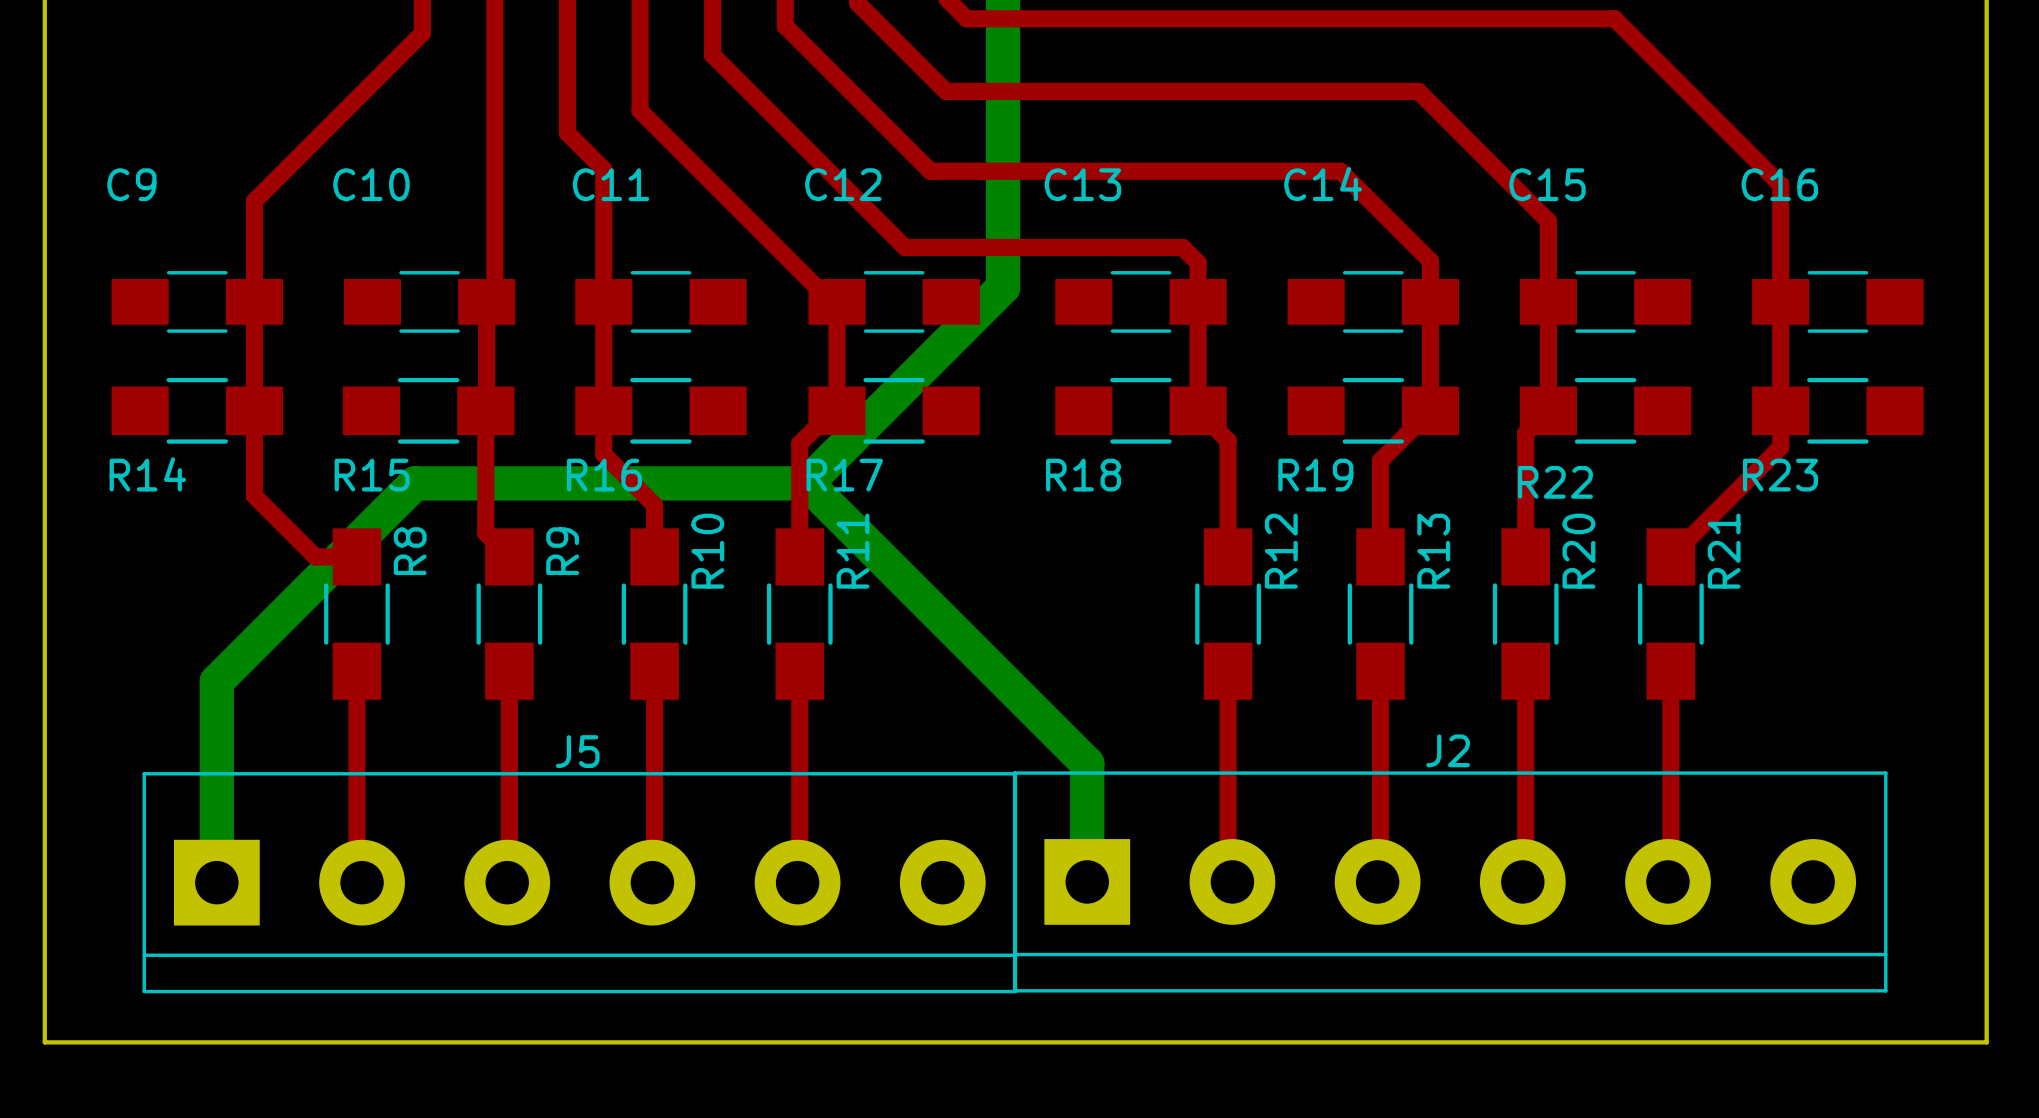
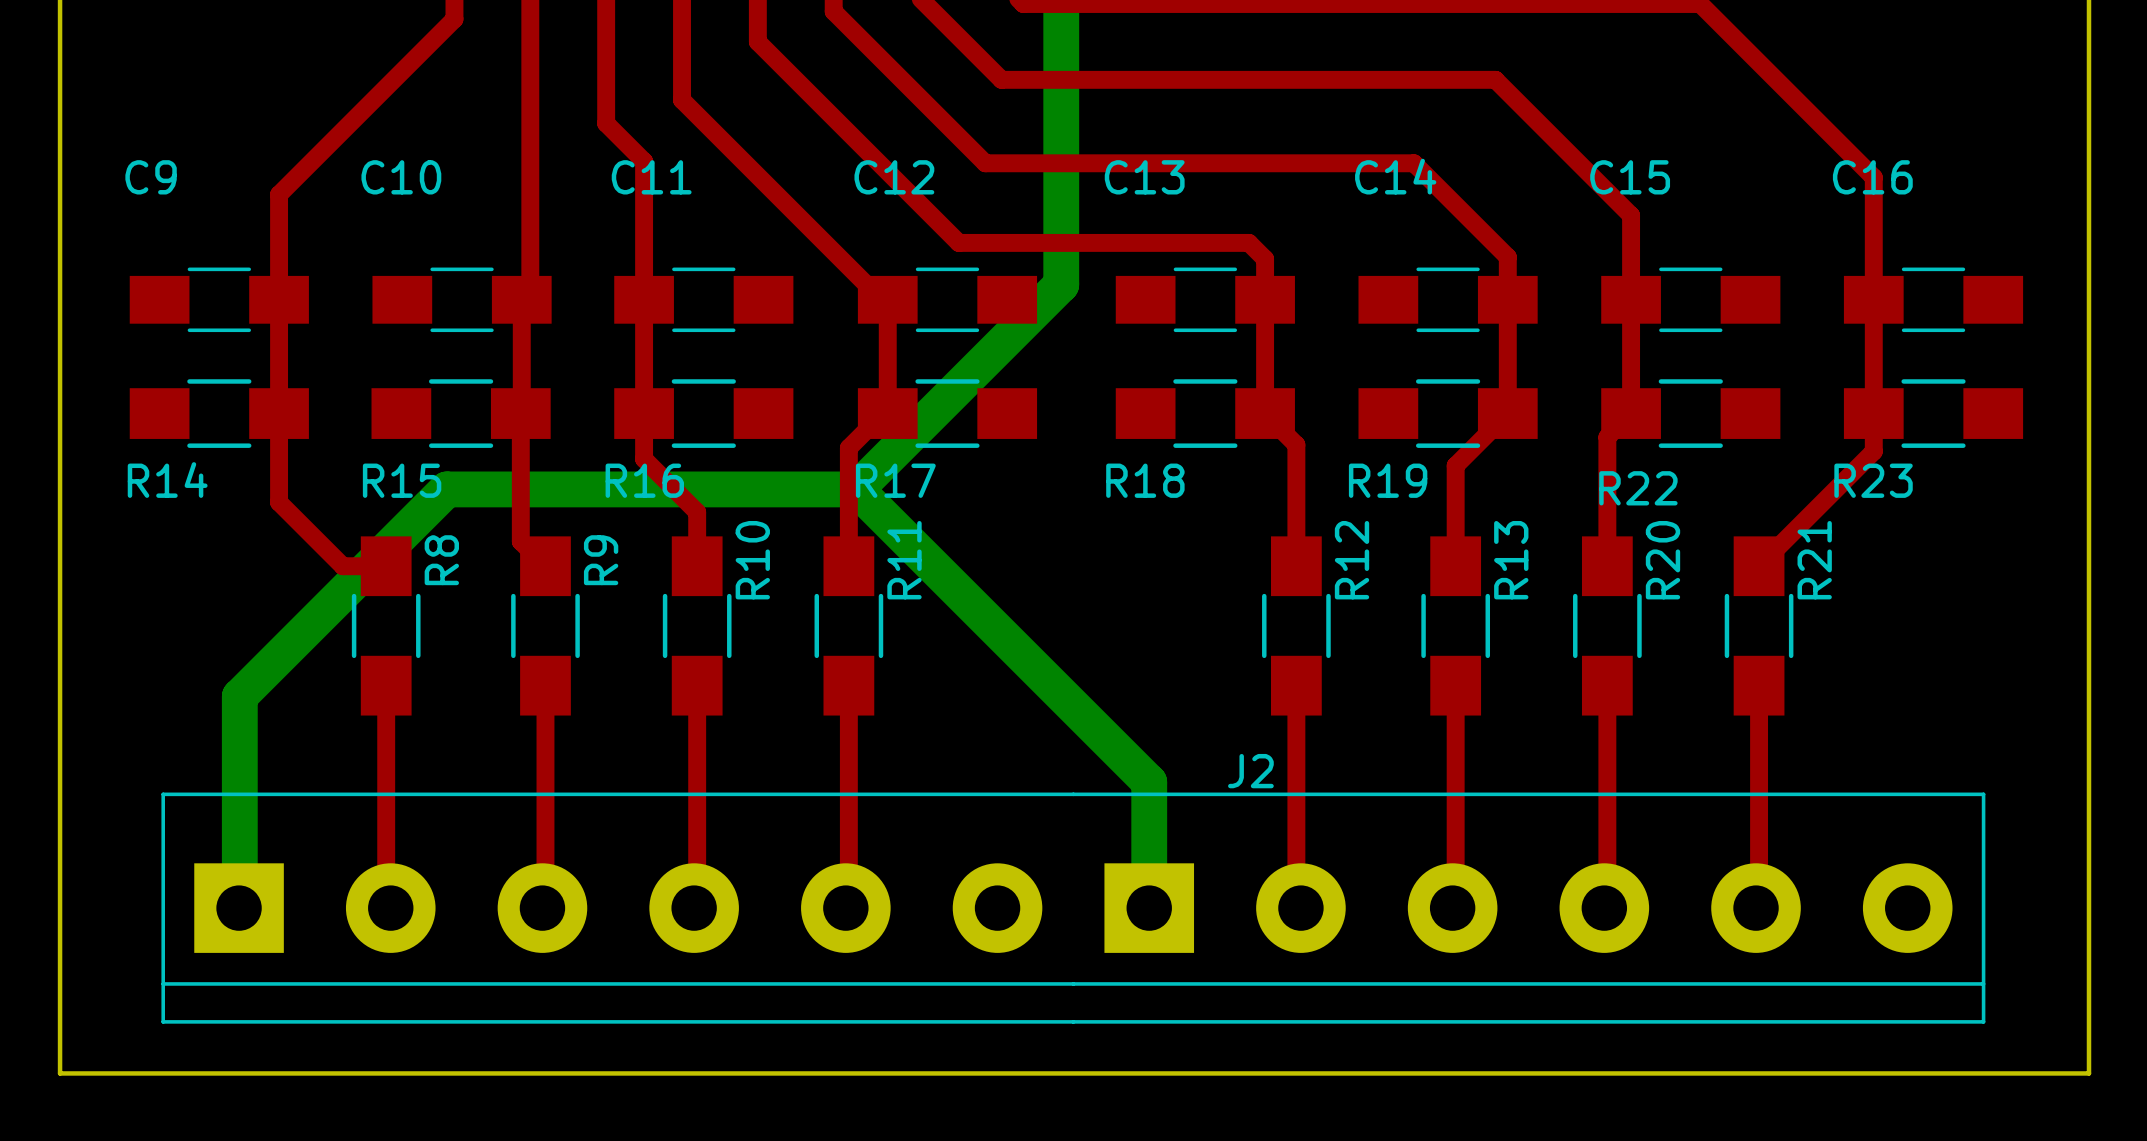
J2 name position: J2 (1448, 750) -> J2 (1250, 771)
J2 footprint: [1012, 771, 1888, 993] -> [161, 792, 1986, 1024]
J5: (579, 882) -> none

